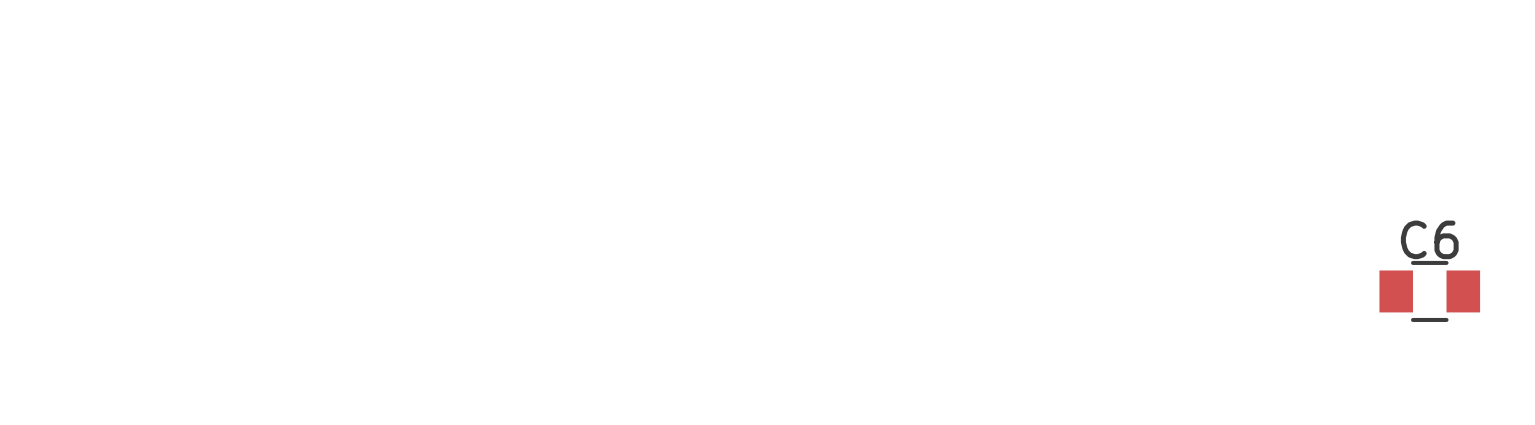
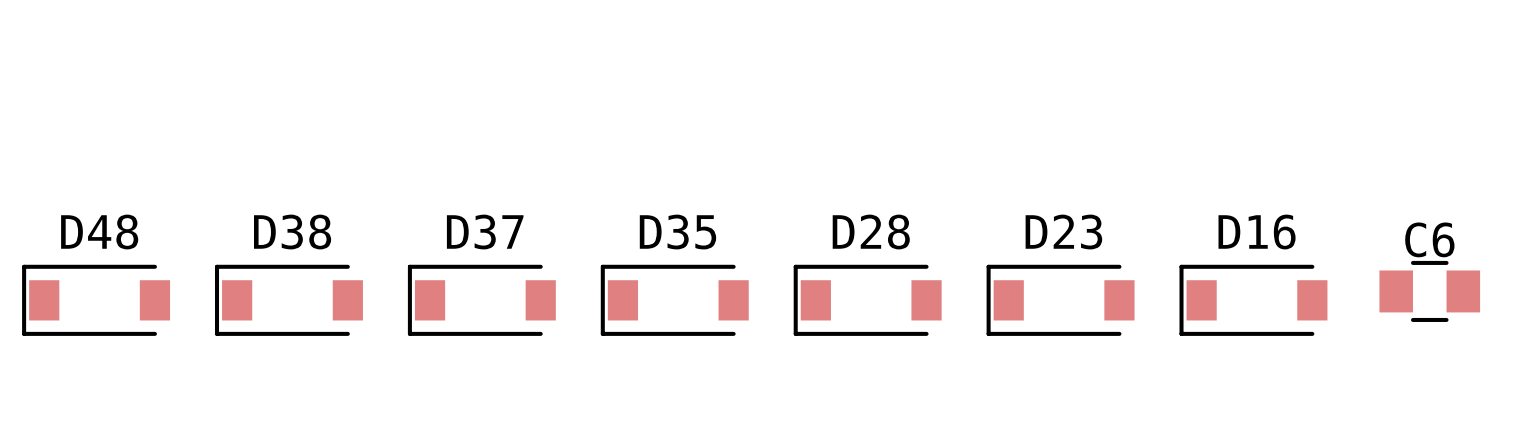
D48: none -> (96, 300)
D38: none -> (288, 300)
D37: none -> (481, 300)
D35: none -> (674, 300)
D28: none -> (867, 300)
D23: none -> (1060, 300)
D16: none -> (1253, 300)

